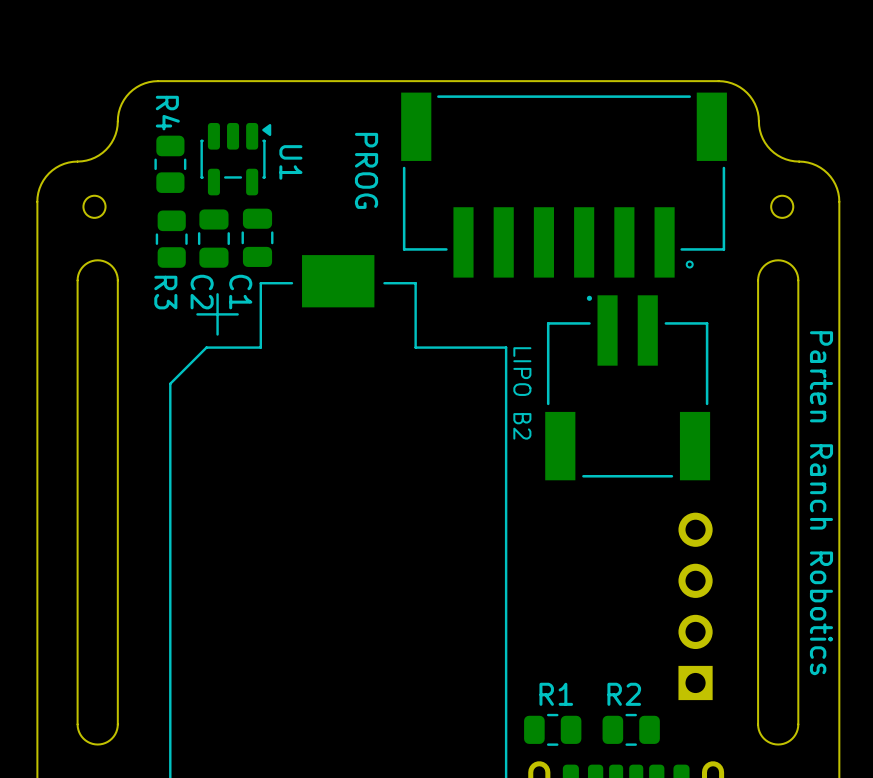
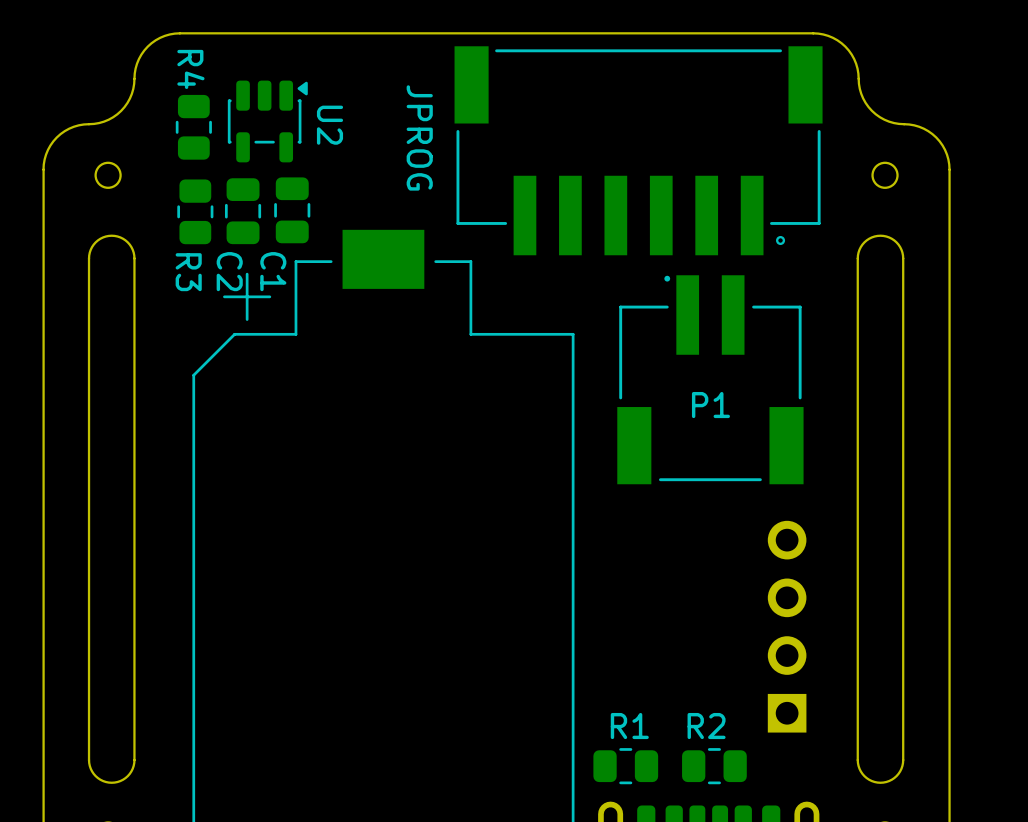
U1 name: U1 (290, 162) -> U2 (329, 125)
JPROG value: PROG (366, 170) -> none
JPROG name: none -> JPROG (419, 137)
P1 value: LIPO B2 (522, 393) -> none
P1 name: none -> P1 (710, 405)
text: Parten Ranch Robotics (821, 503) -> none

